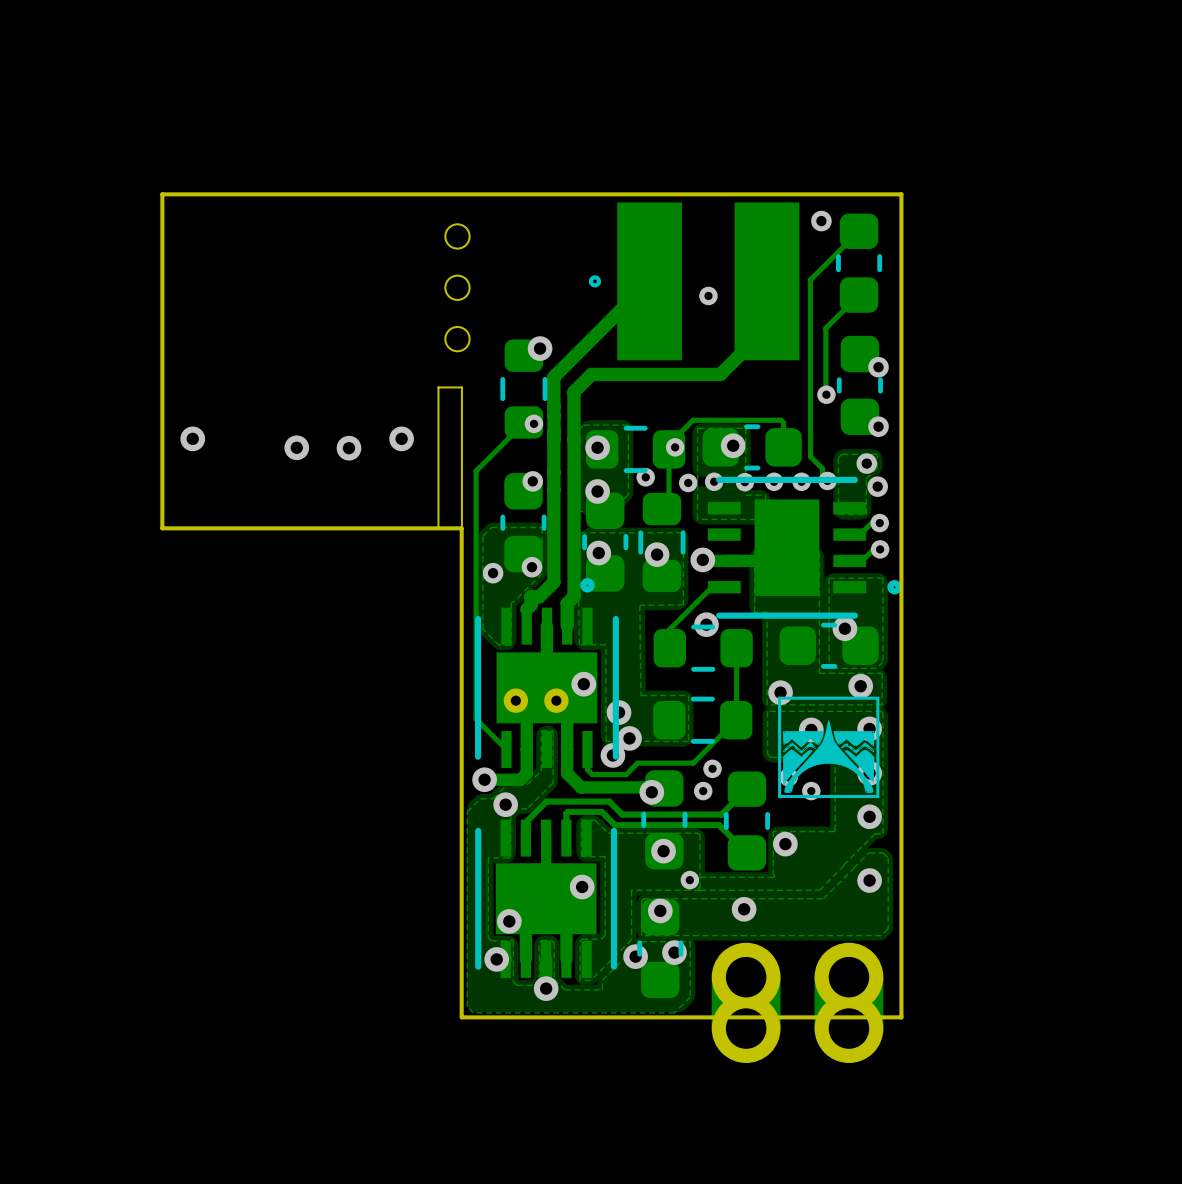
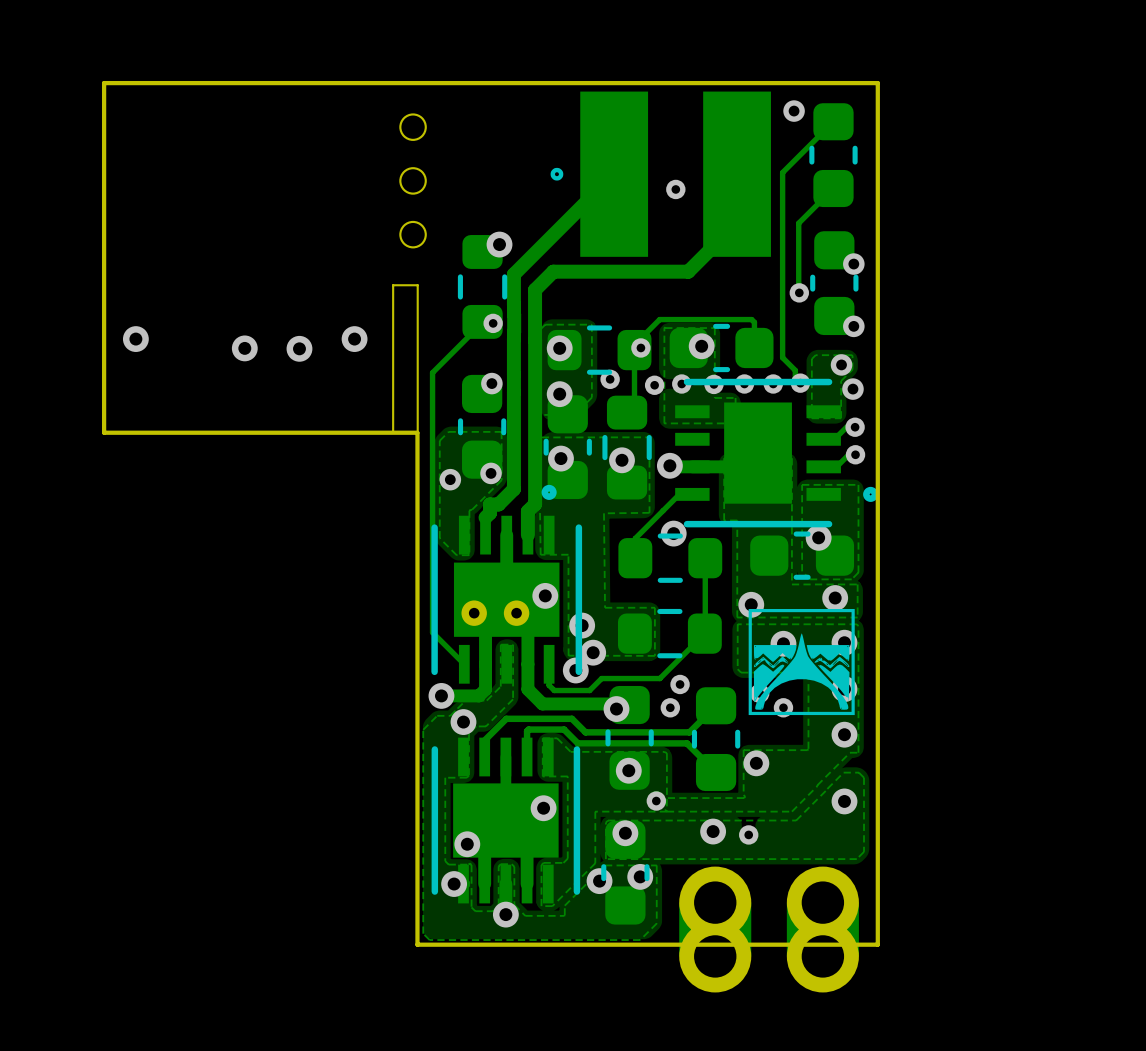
via: none -> (748, 834)

